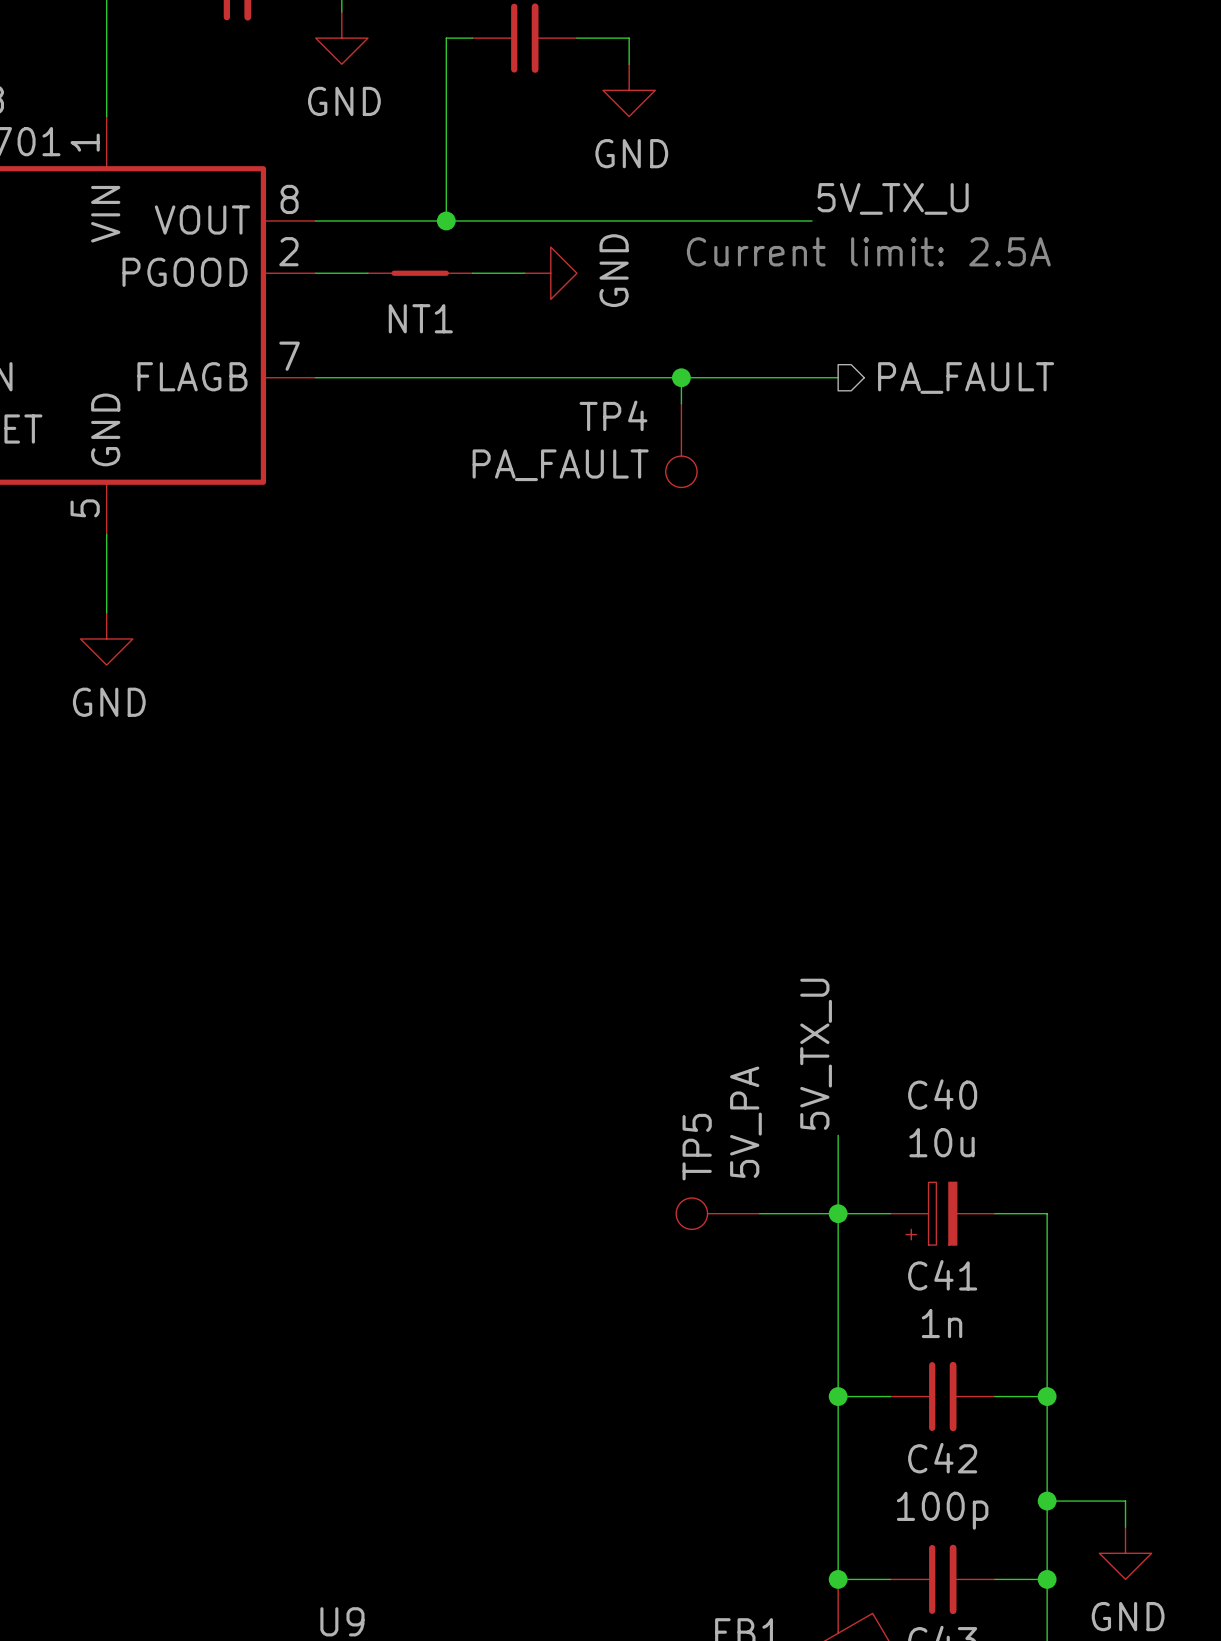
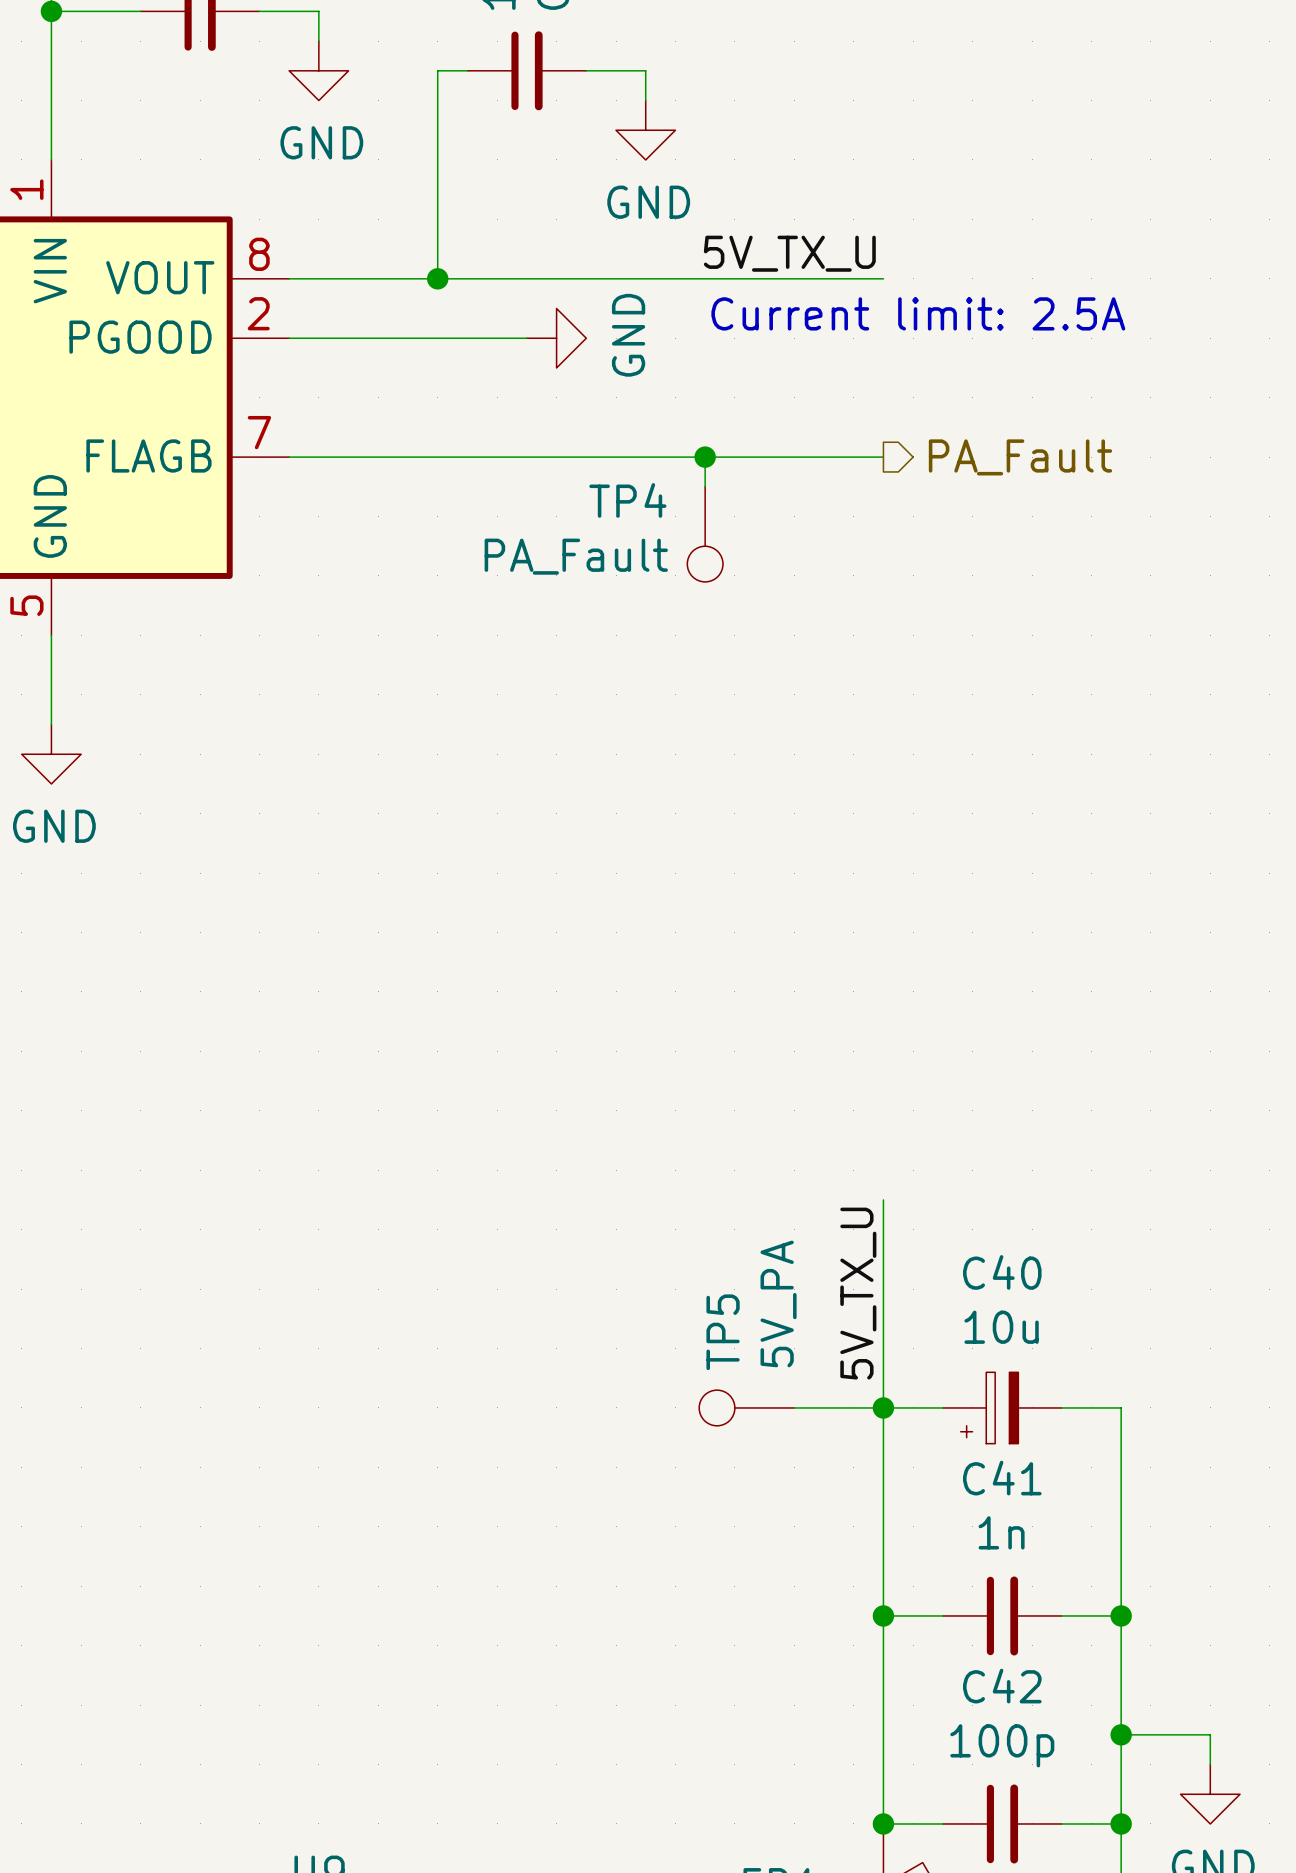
label position: 5V_TX_U (893, 198) -> 5V_TX_U (789, 253)
wire: none -> (853, 278) (883, 278)
NT1: (420, 273) -> none
hierarchical label: PA_FAULT (966, 378) -> PA_Fault (1020, 457)
TP4 value: PA_FAULT (560, 465) -> PA_Fault (576, 556)
wire: none -> (883, 1199) (883, 1318)
label position: 5V_TX_U (816, 1054) -> 5V_TX_U (858, 1293)

